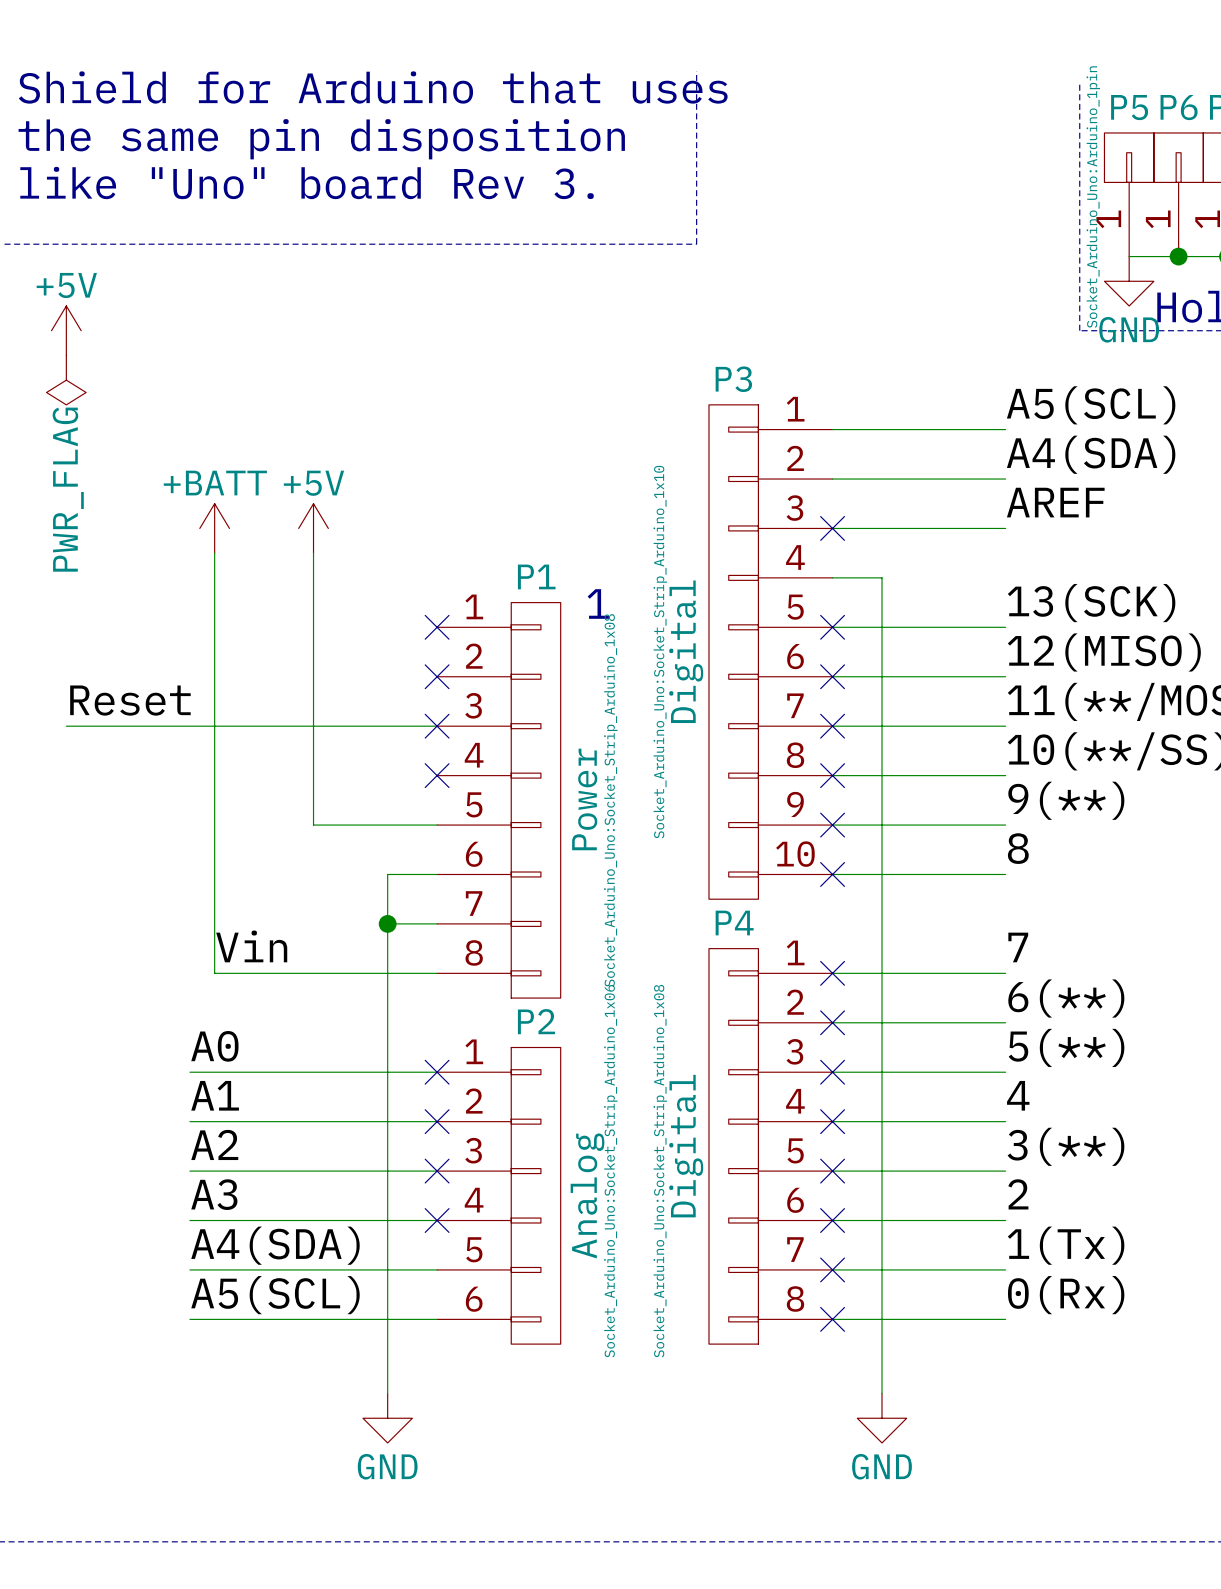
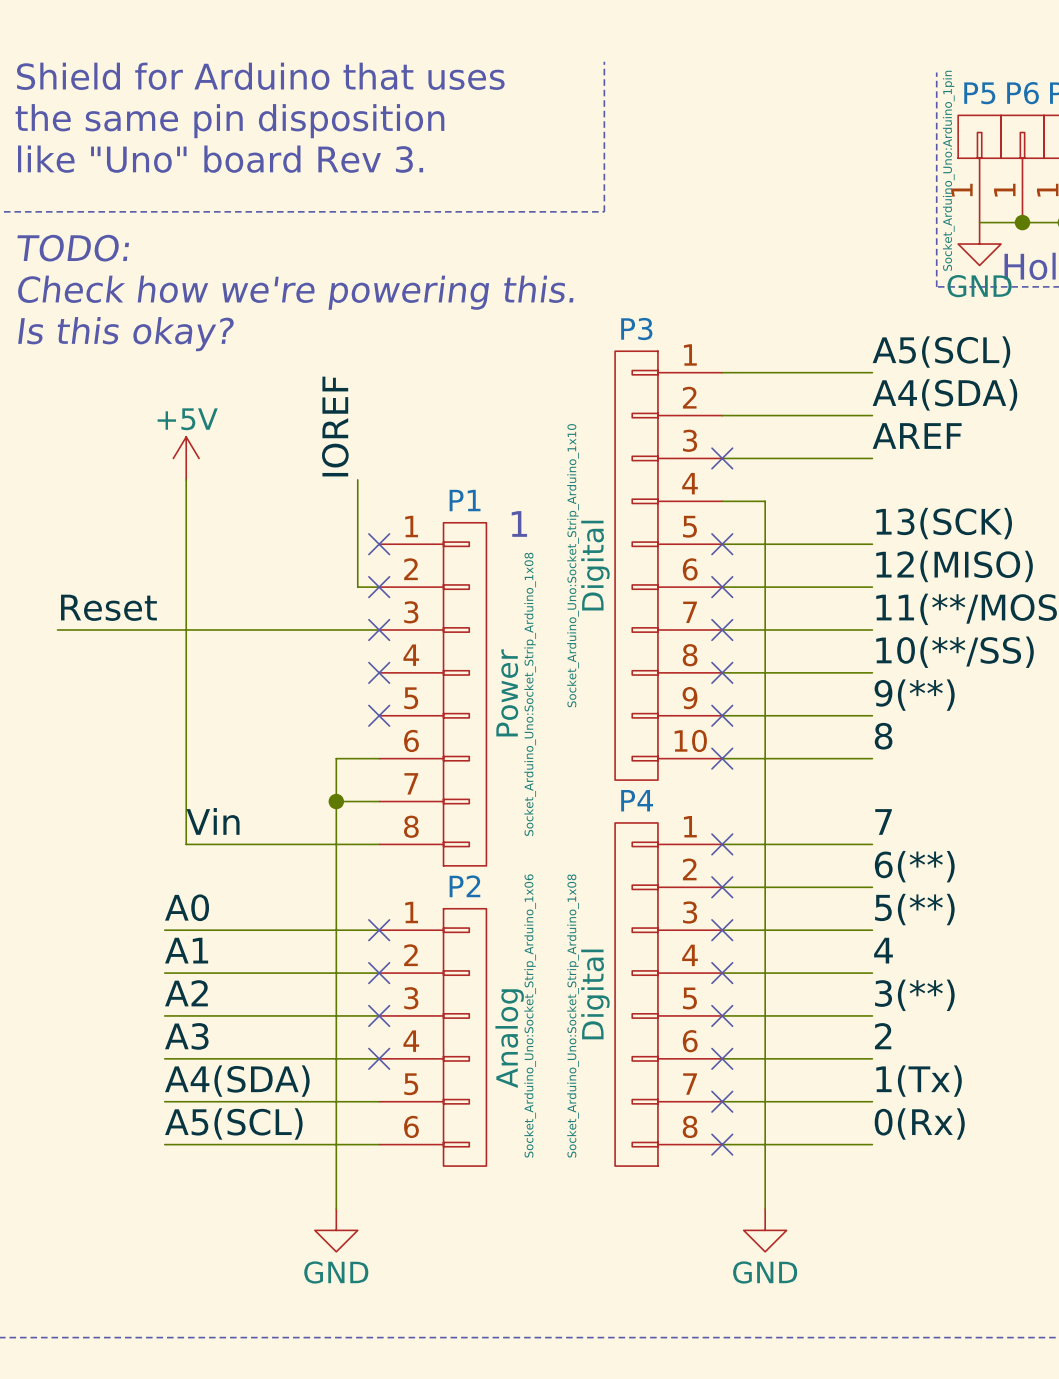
text: none -> TODO: (73, 248)
power symbol: +5V (66, 330) -> none
text: none -> Check how we're powering this. (295, 292)
power symbol: PWR_FLAG (66, 380) -> none
text: none -> Is this okay? (126, 334)
label: none -> IOREF (335, 426)
power symbol: +BATT (214, 528) -> +5V (186, 458)
power symbol: +5V (313, 528) -> none
wire: (313, 553) (313, 825) (437, 825) -> none
wire: none -> (357, 479) (357, 587) (379, 587)
no-connect mark: none -> (379, 715)

